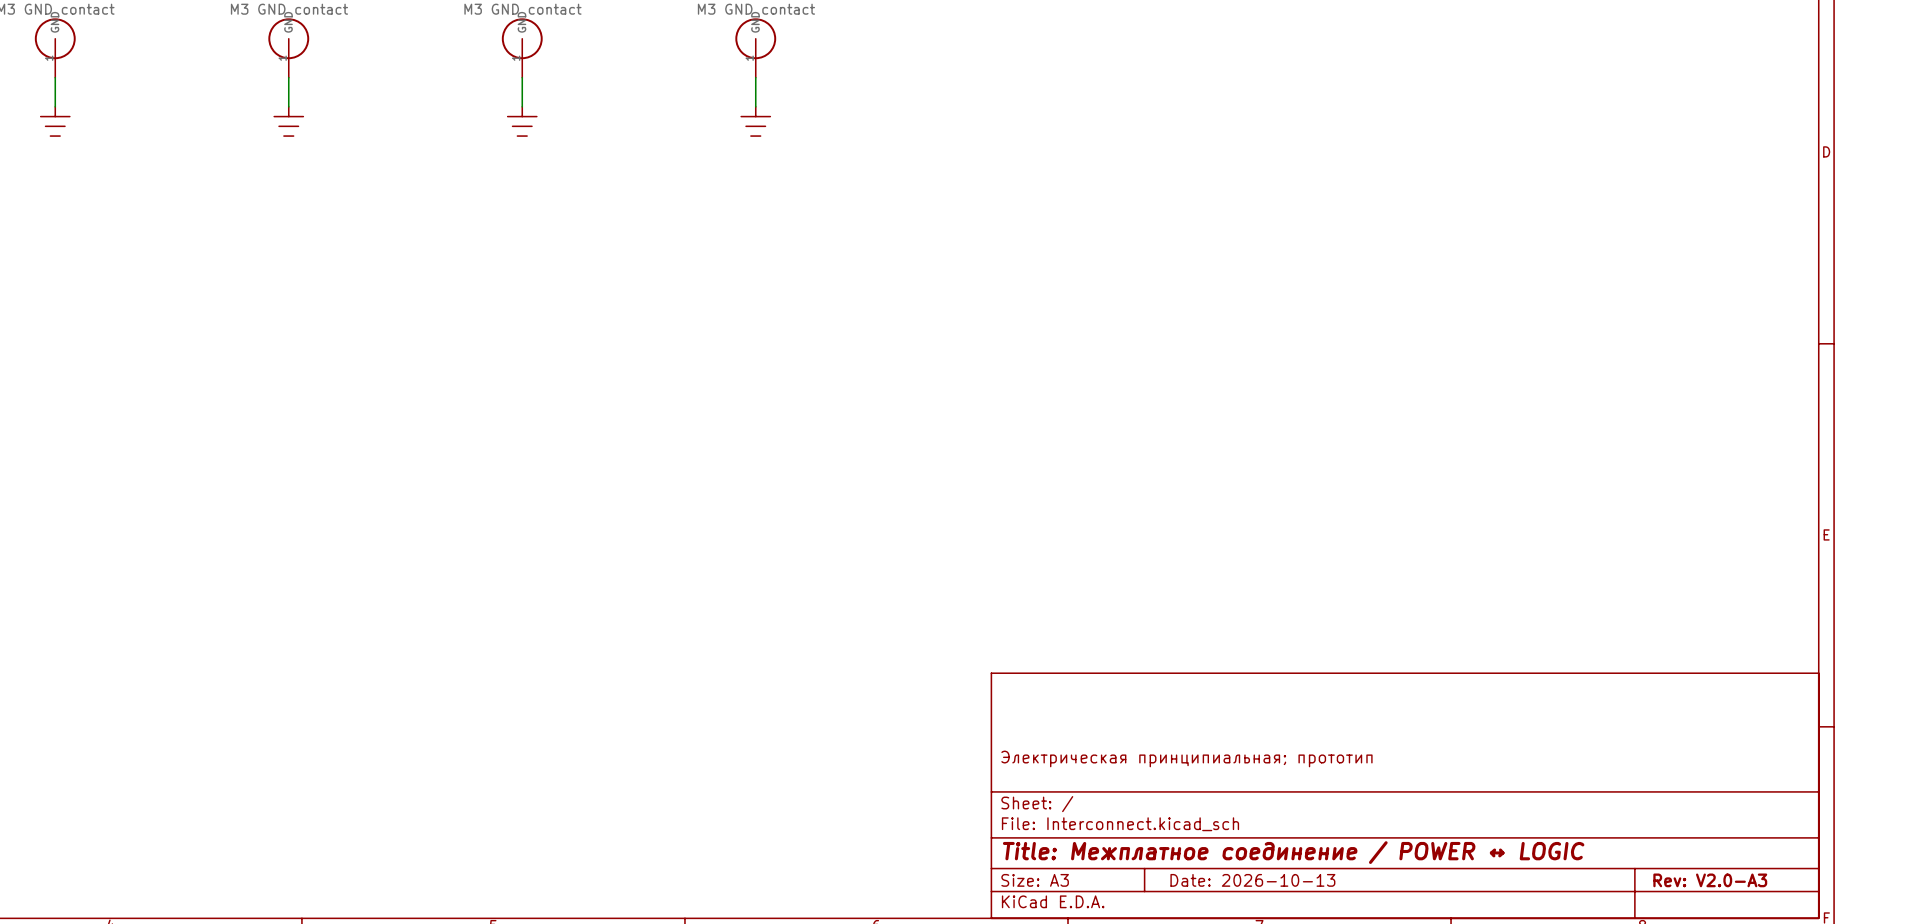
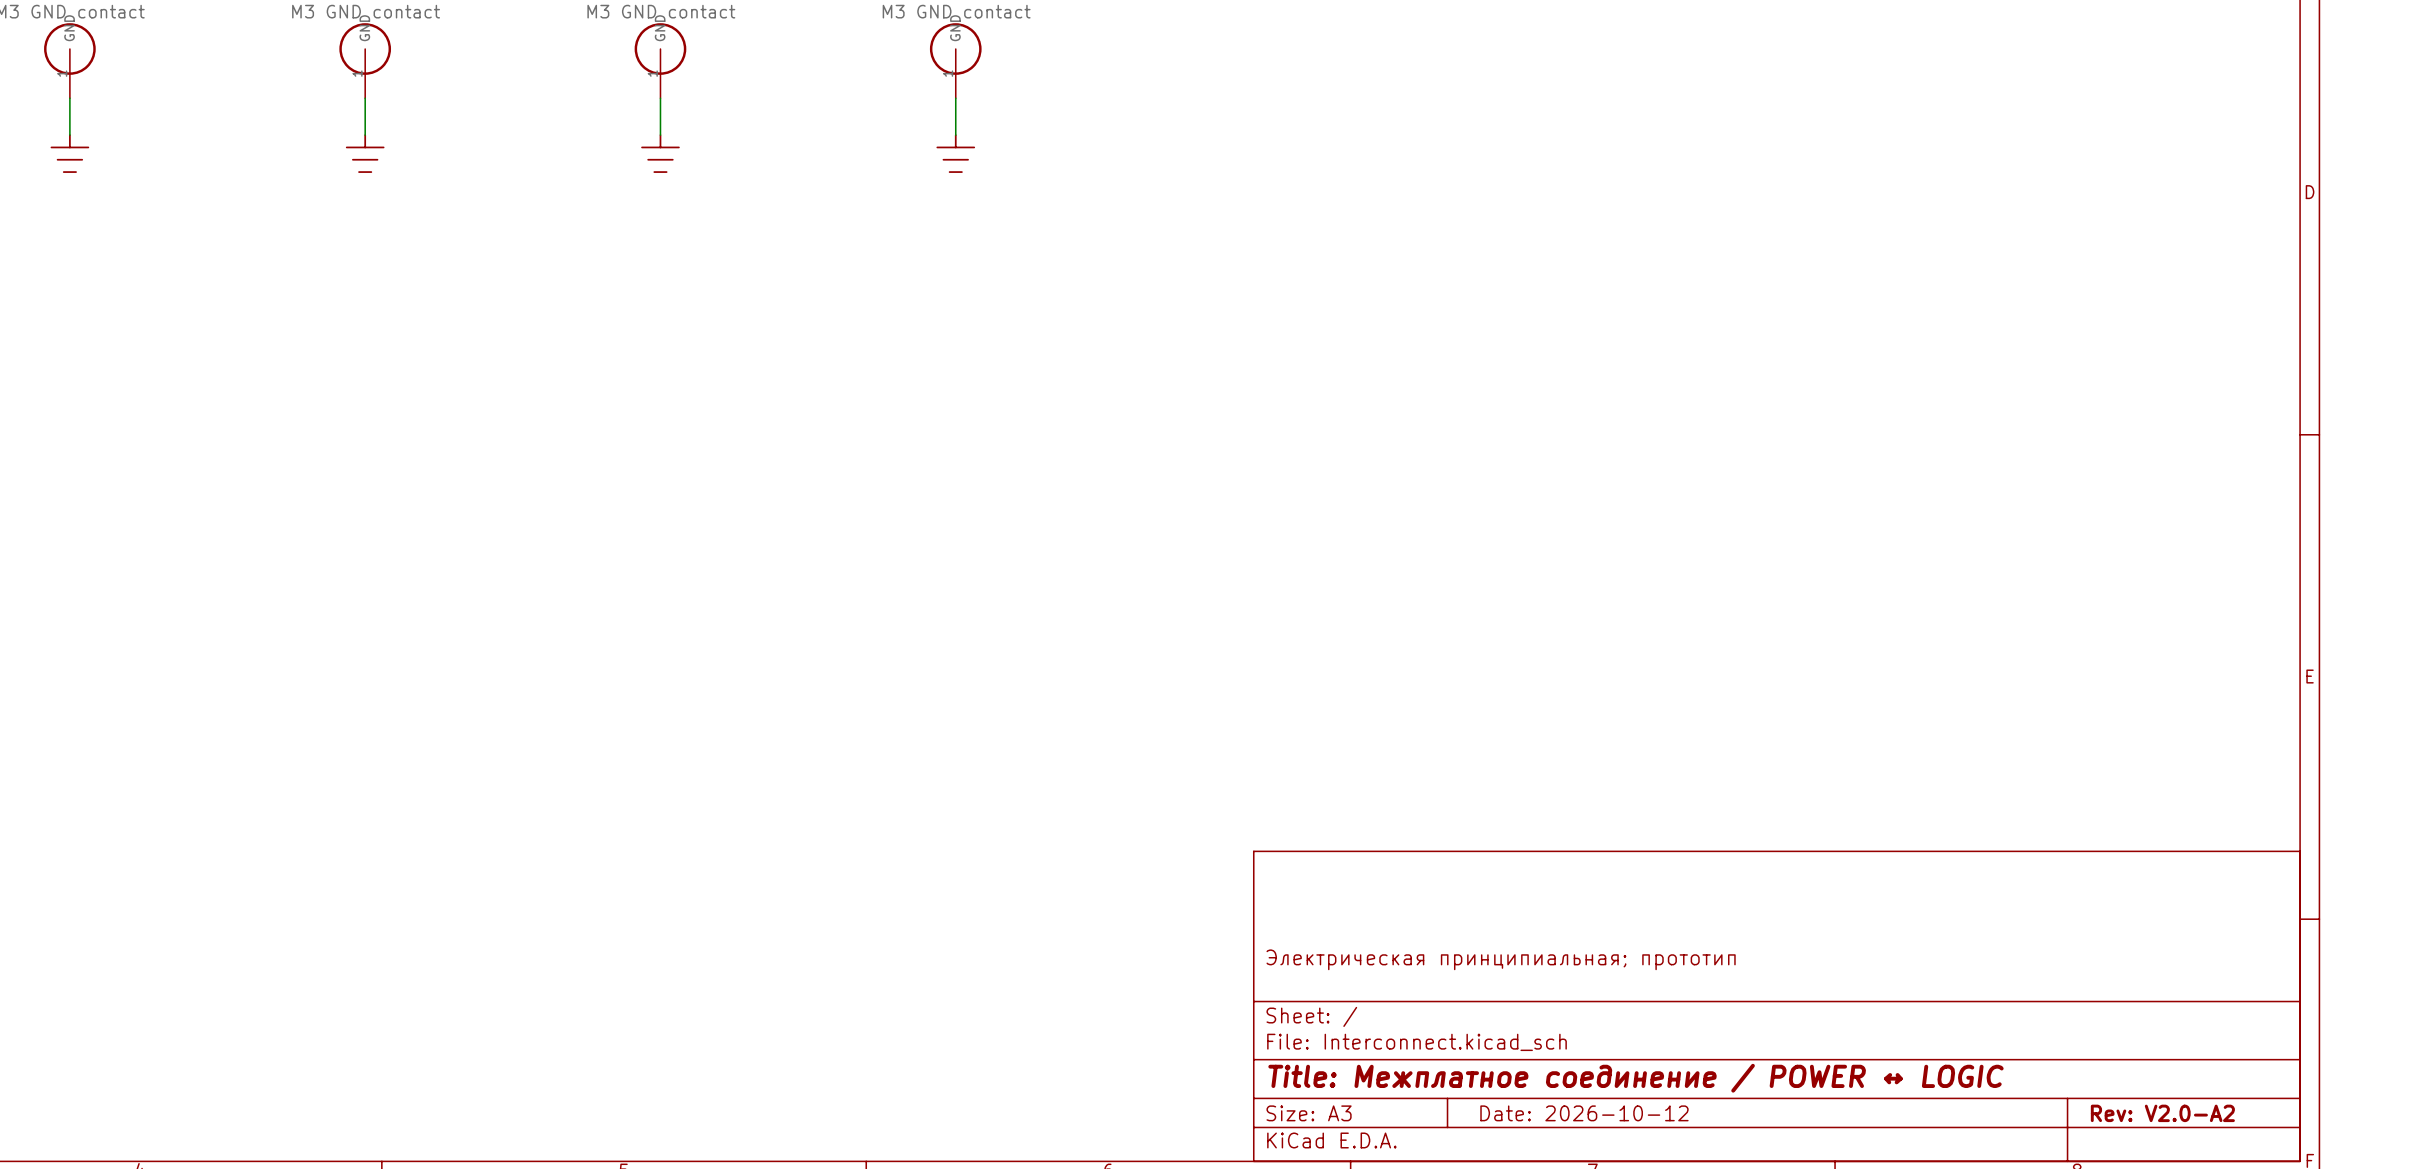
title block: Date: 2026-10-13 (1252, 880) -> Date: 2026-10-12 (1584, 1113)
title block: Rev: V2.0-A3 (1710, 880) -> Rev: V2.0-A2 (2162, 1113)

